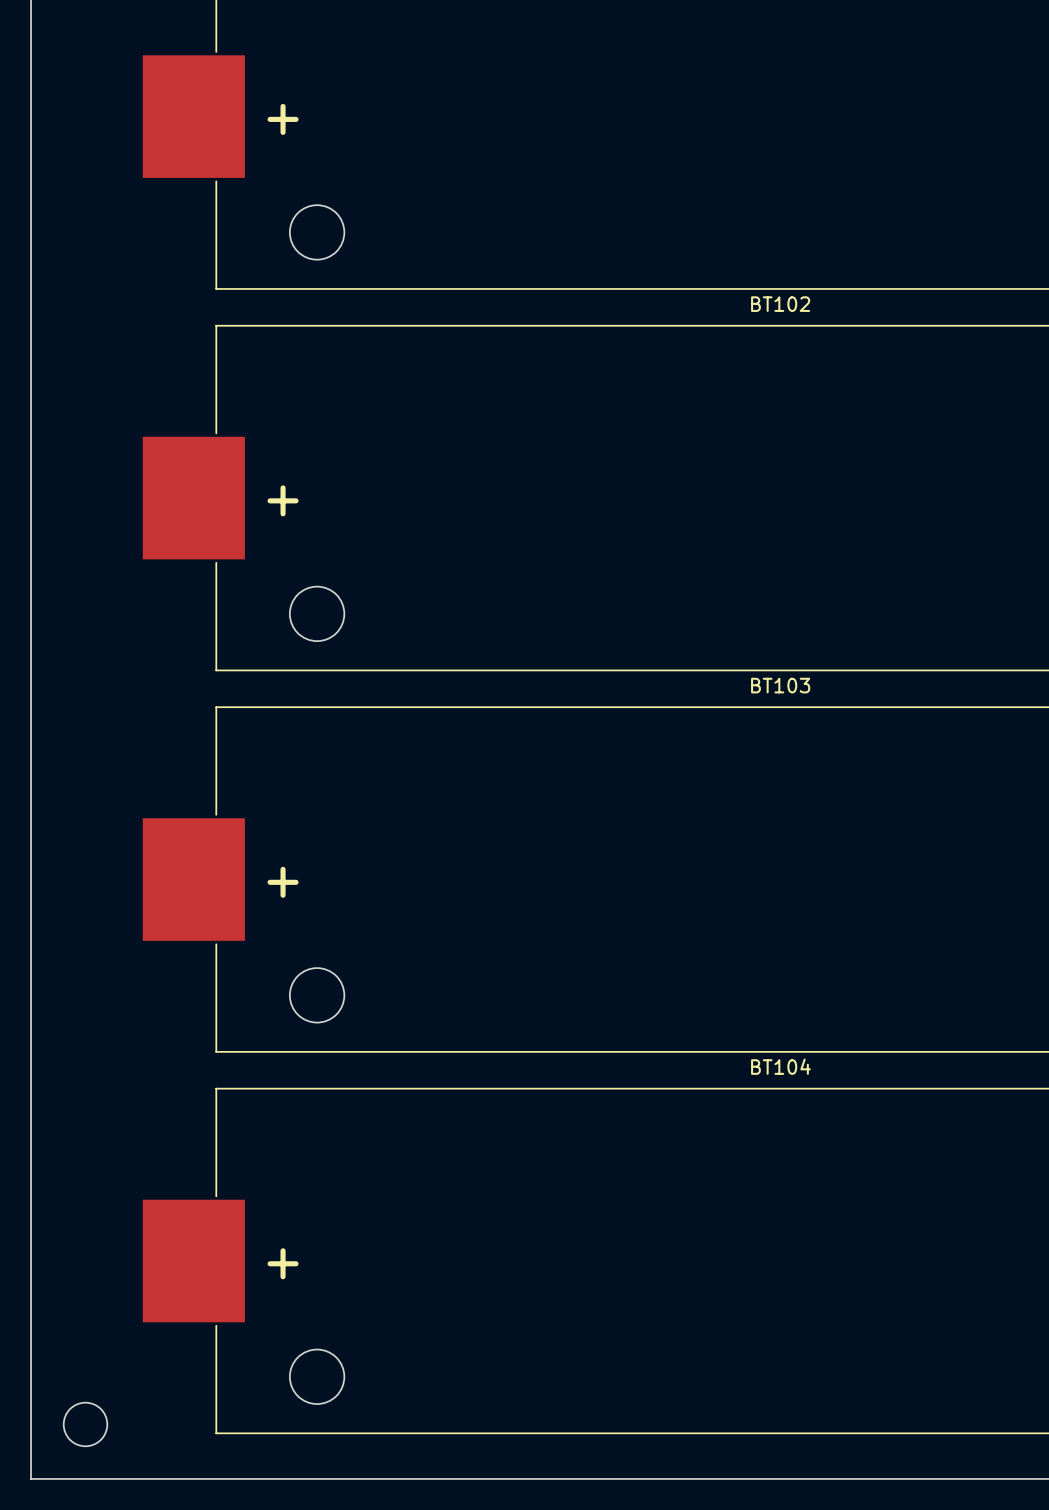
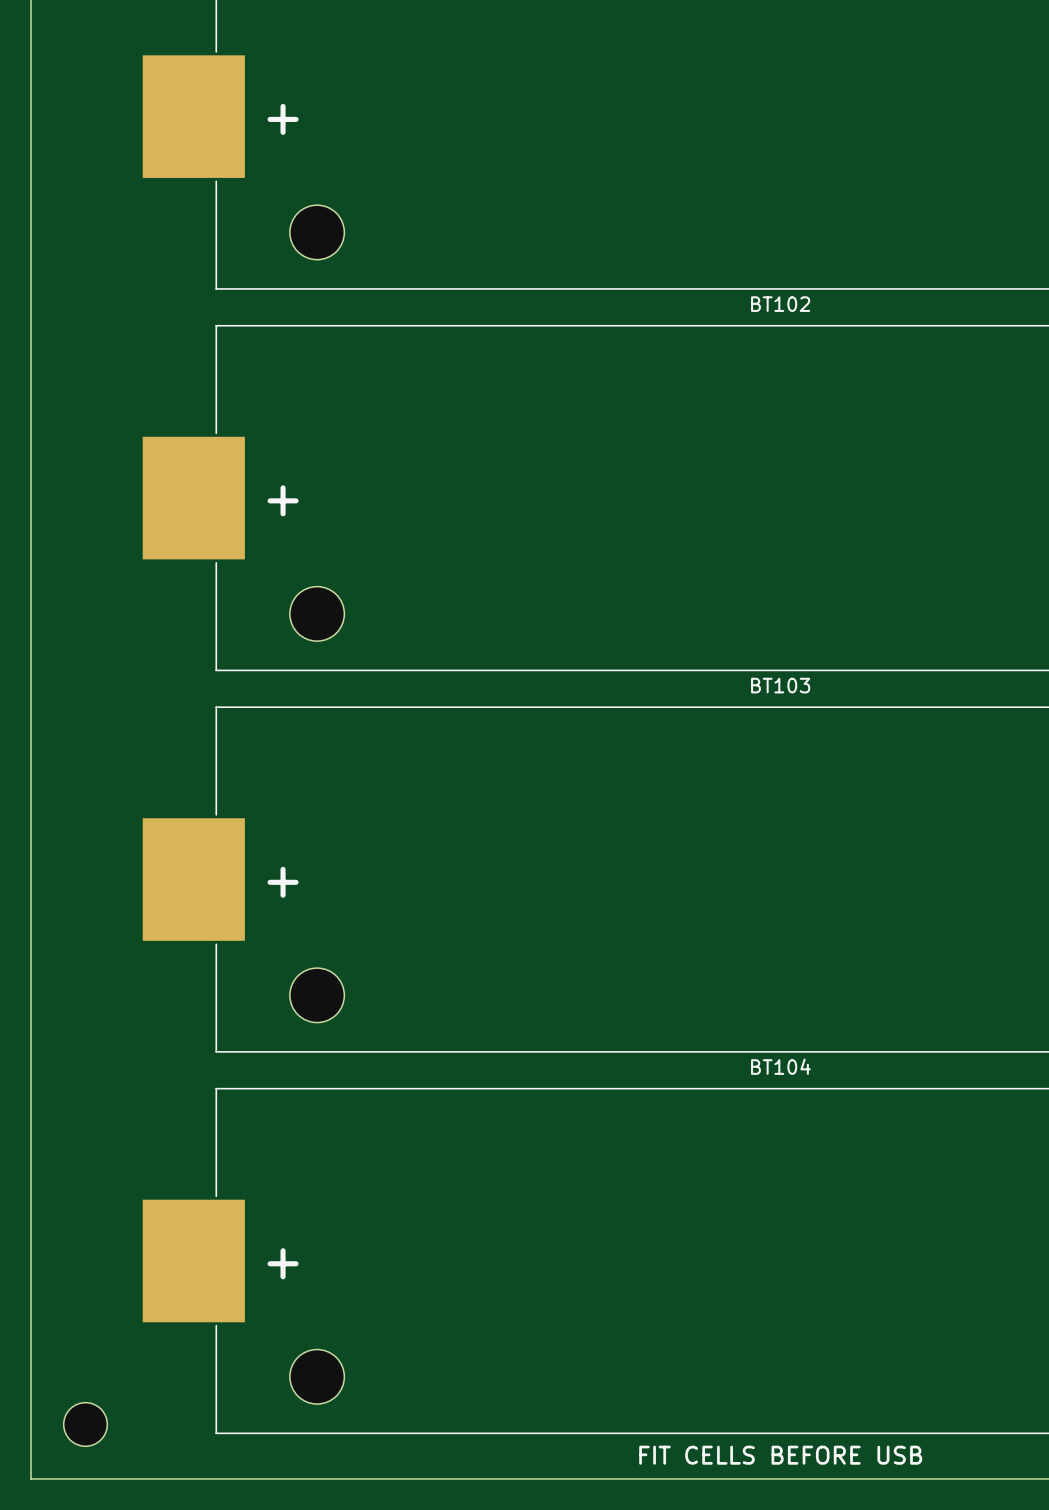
text: none -> FIT CELLS BEFORE USB (780, 1455)

